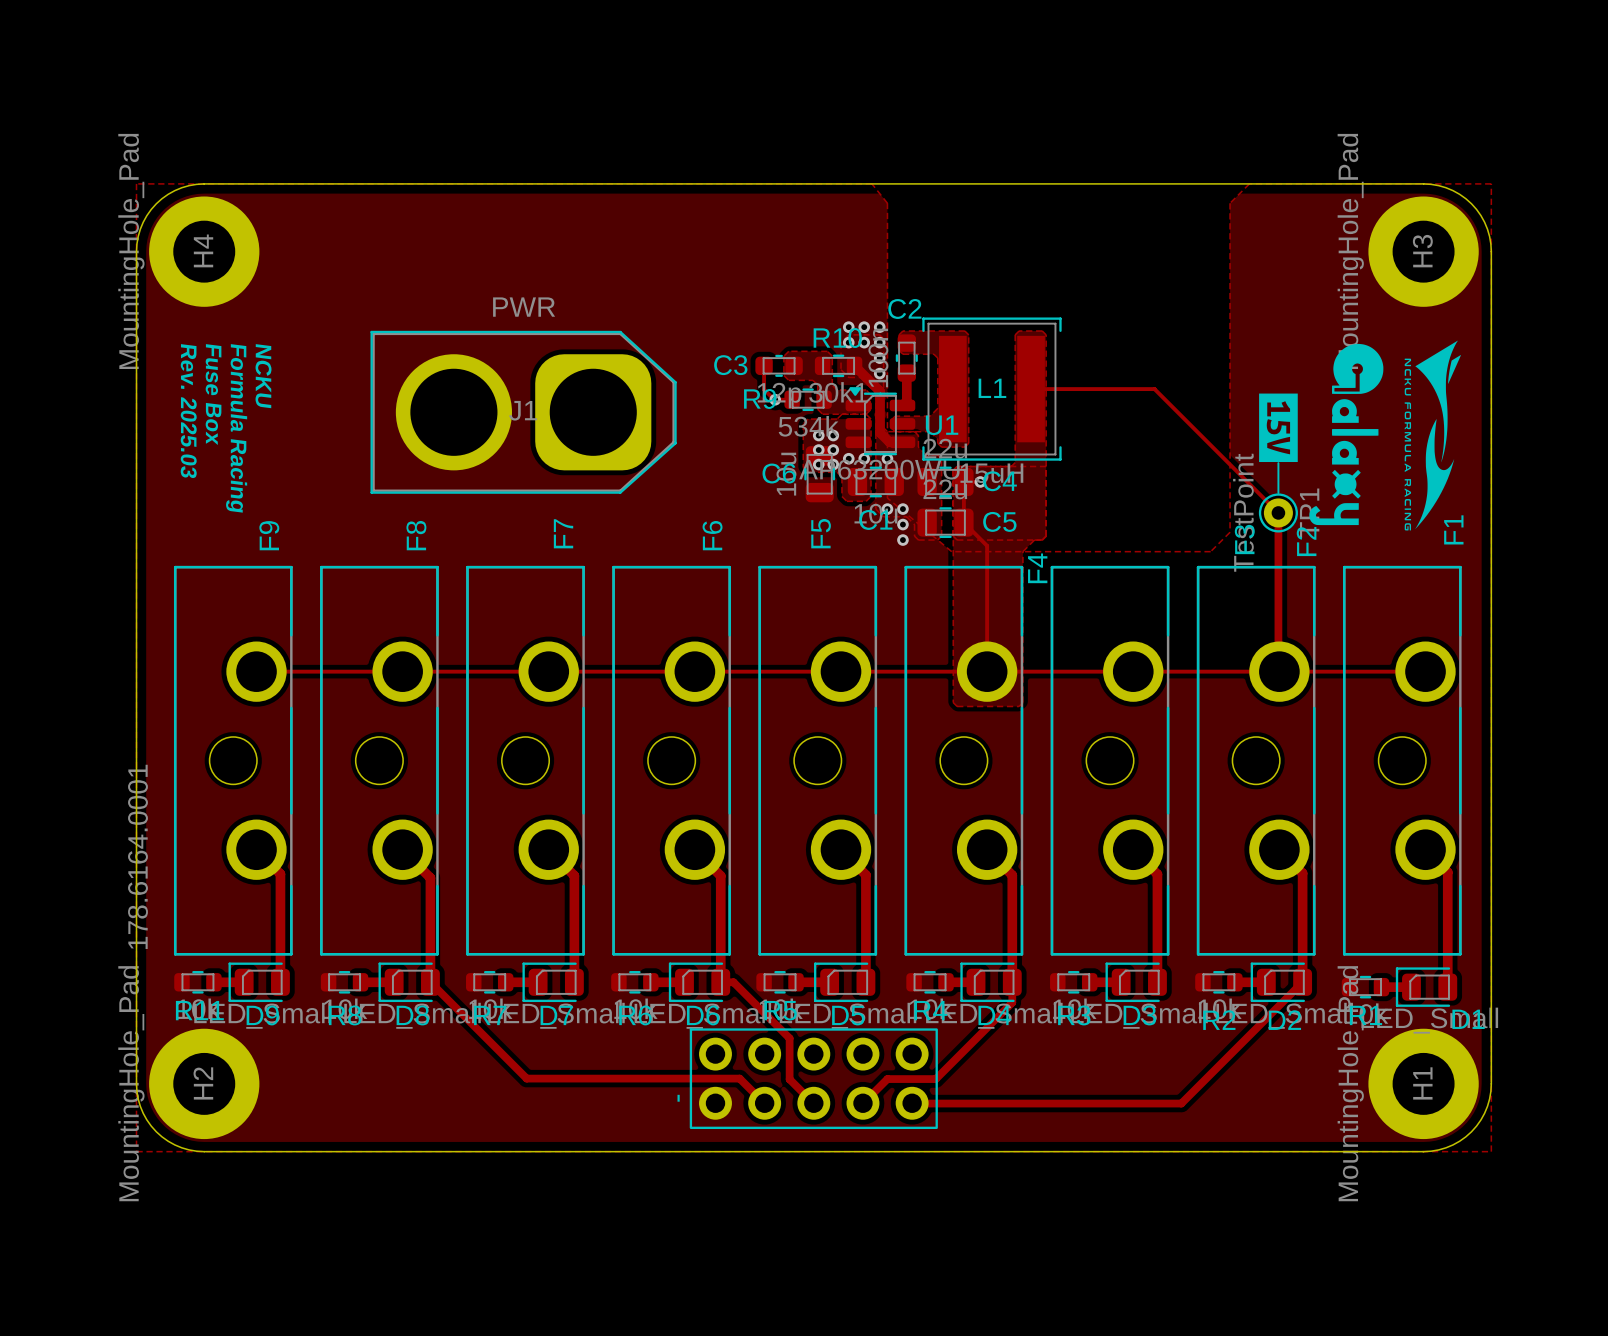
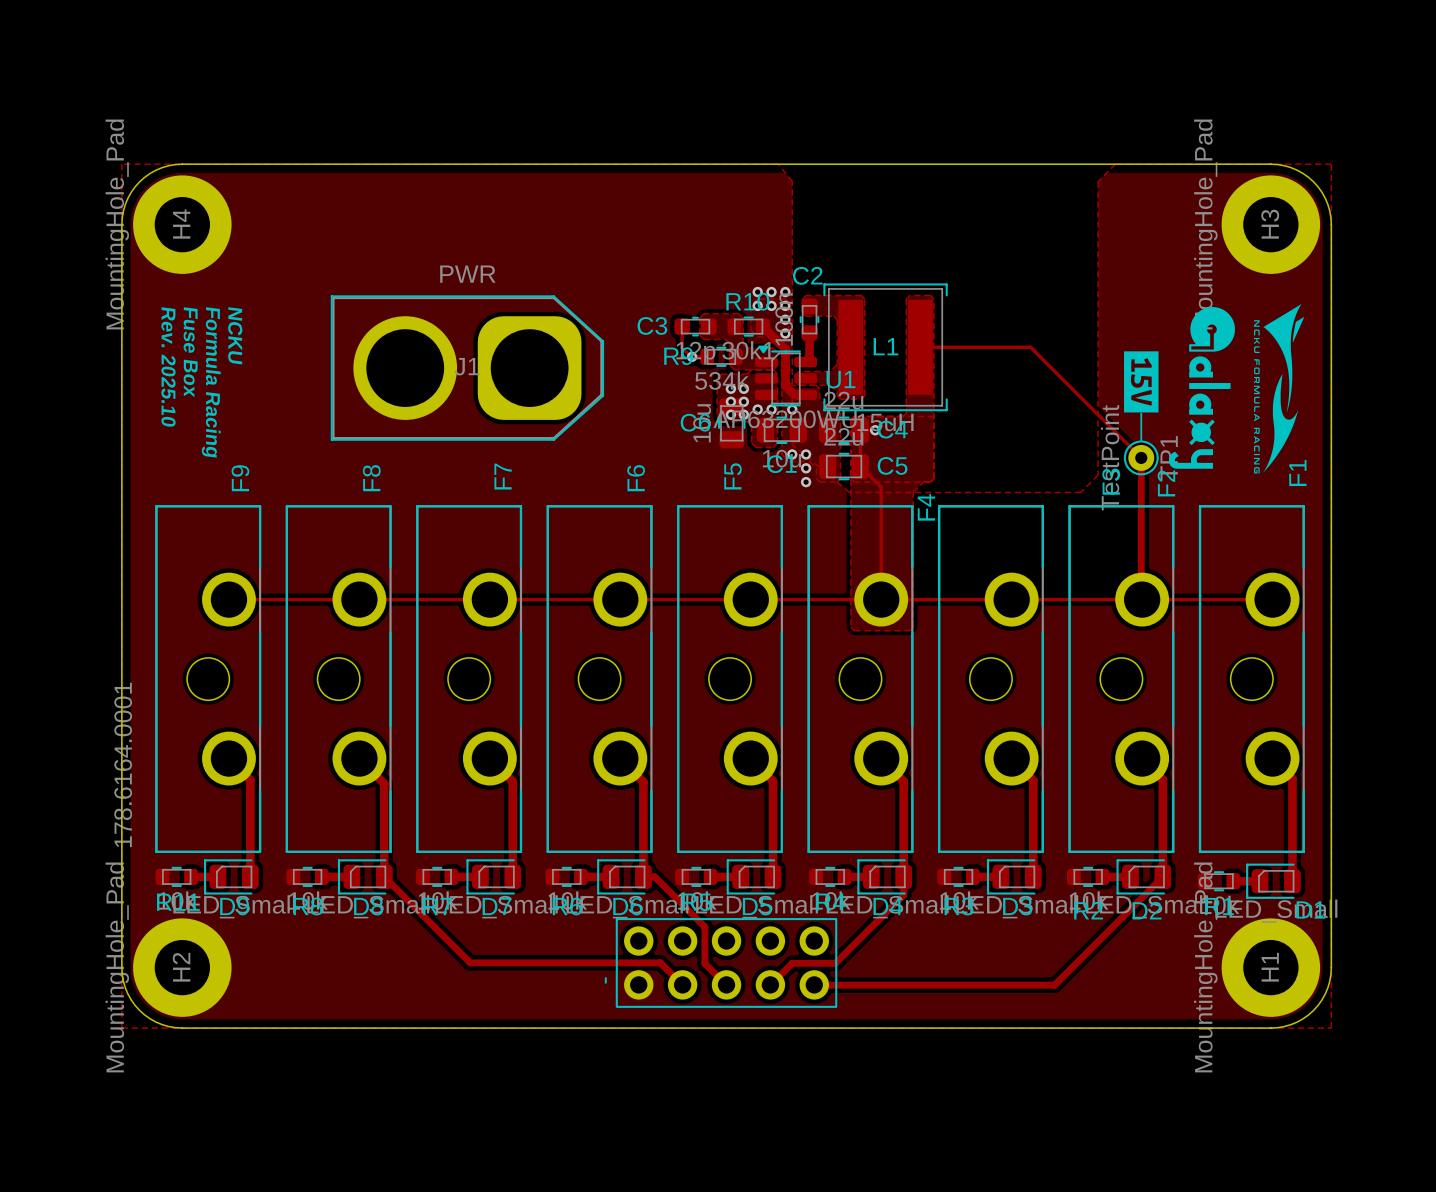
text: Rev. 2025.03 (188, 411) -> Rev. 2025.10 (168, 367)

